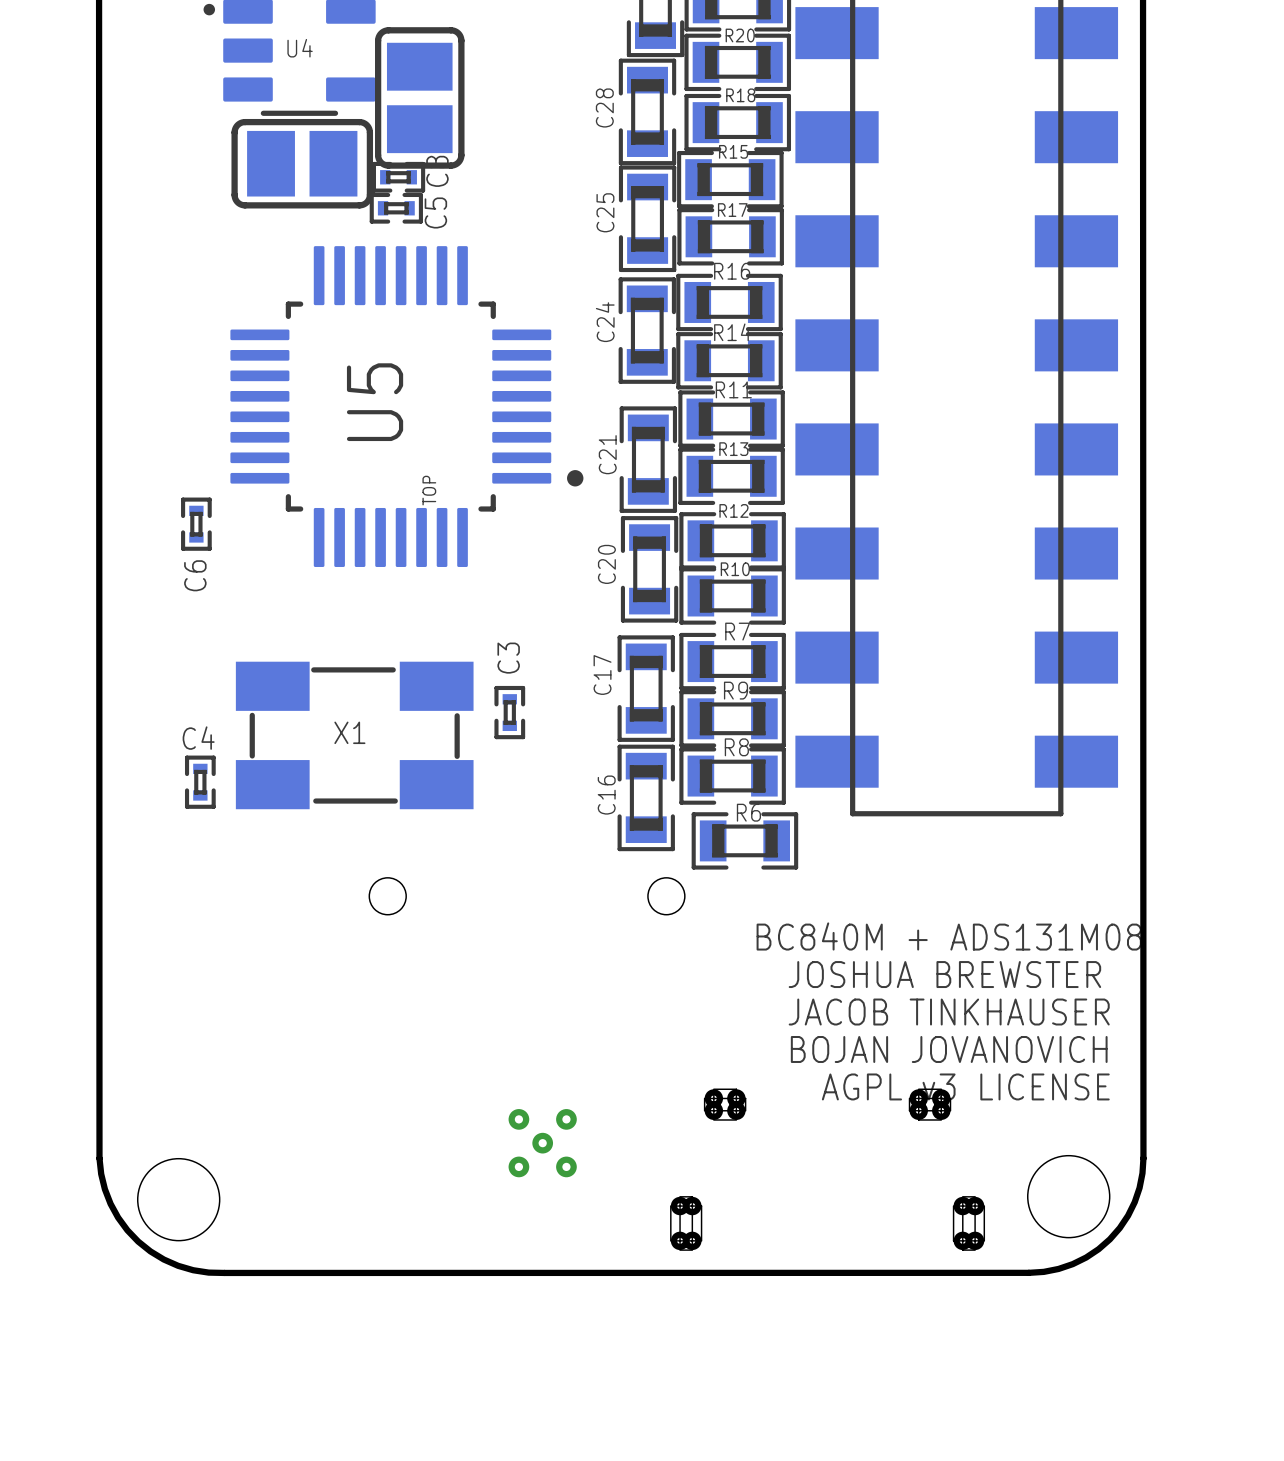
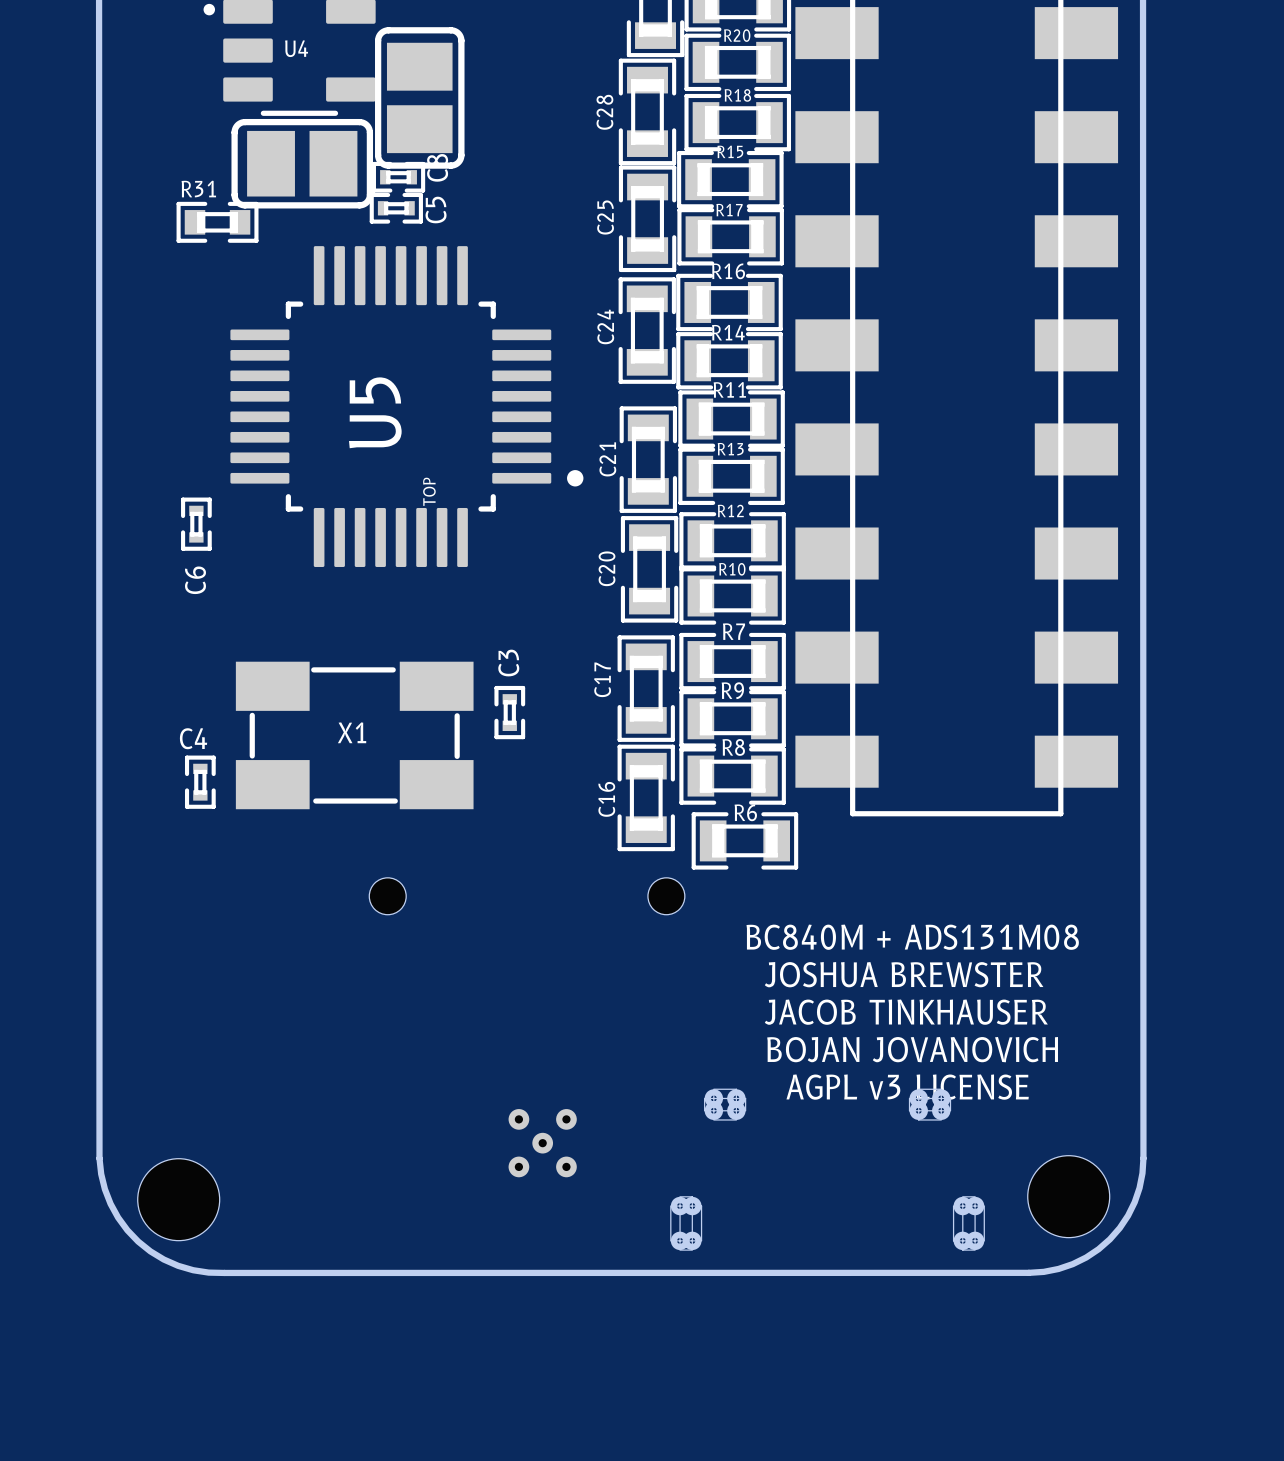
R31: none -> (217, 222)

